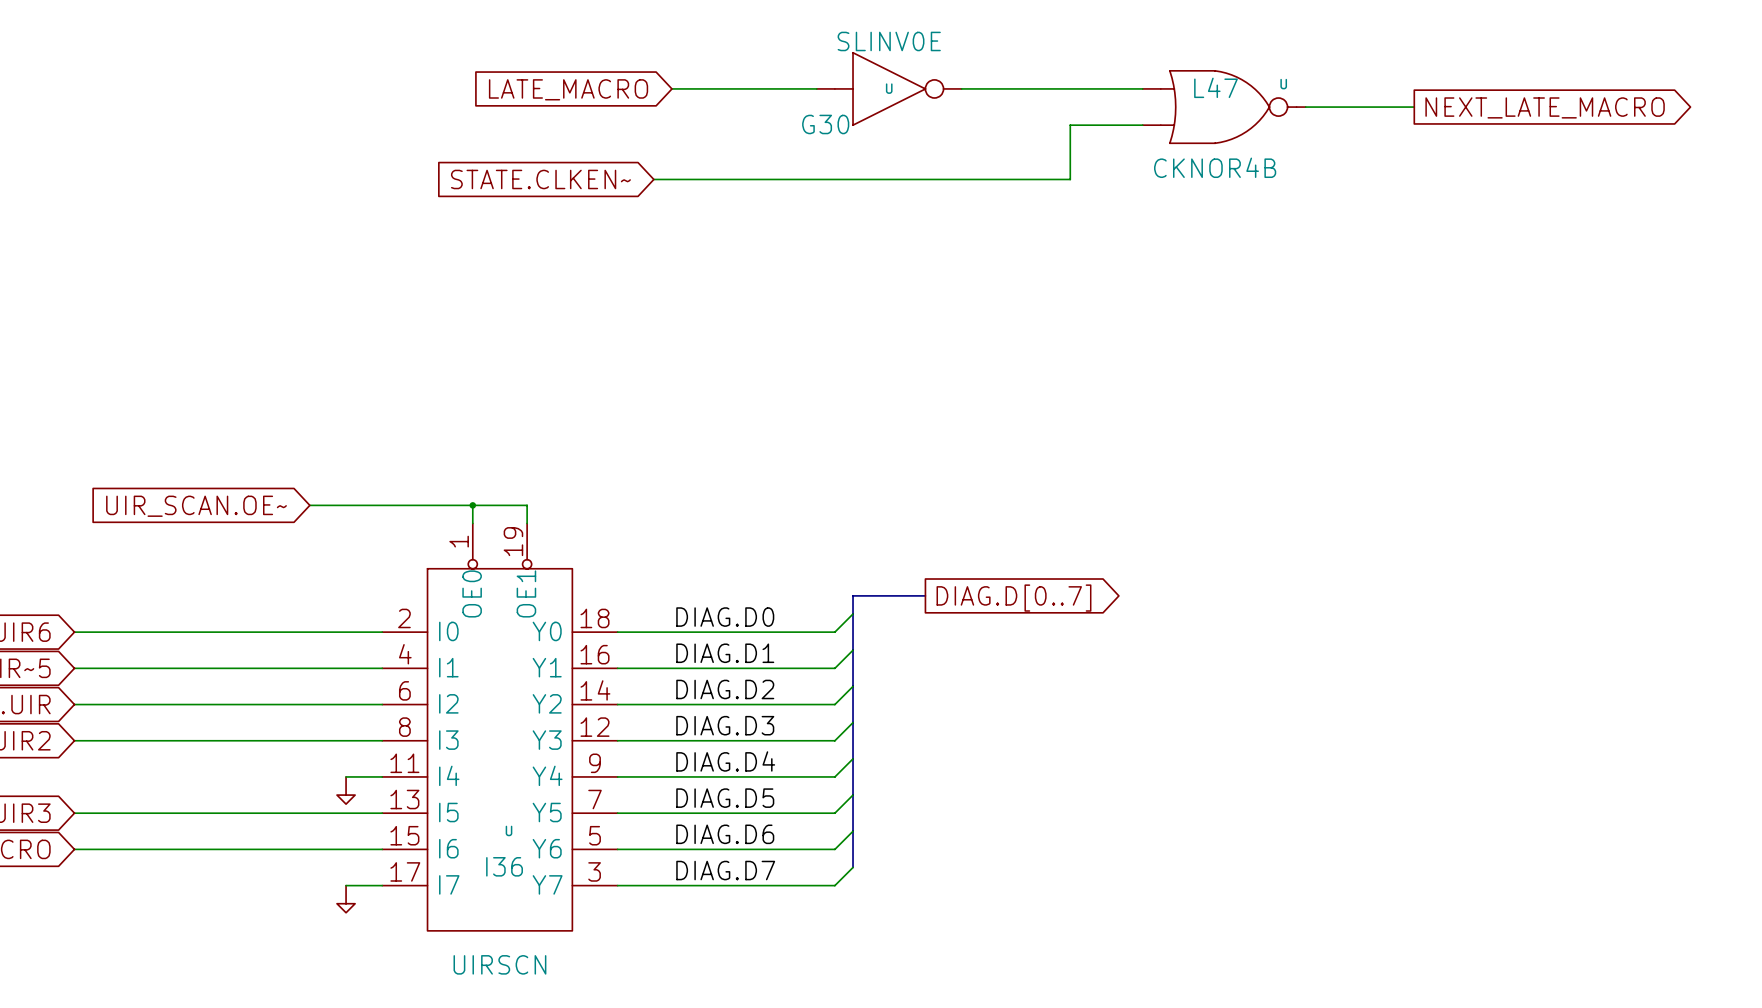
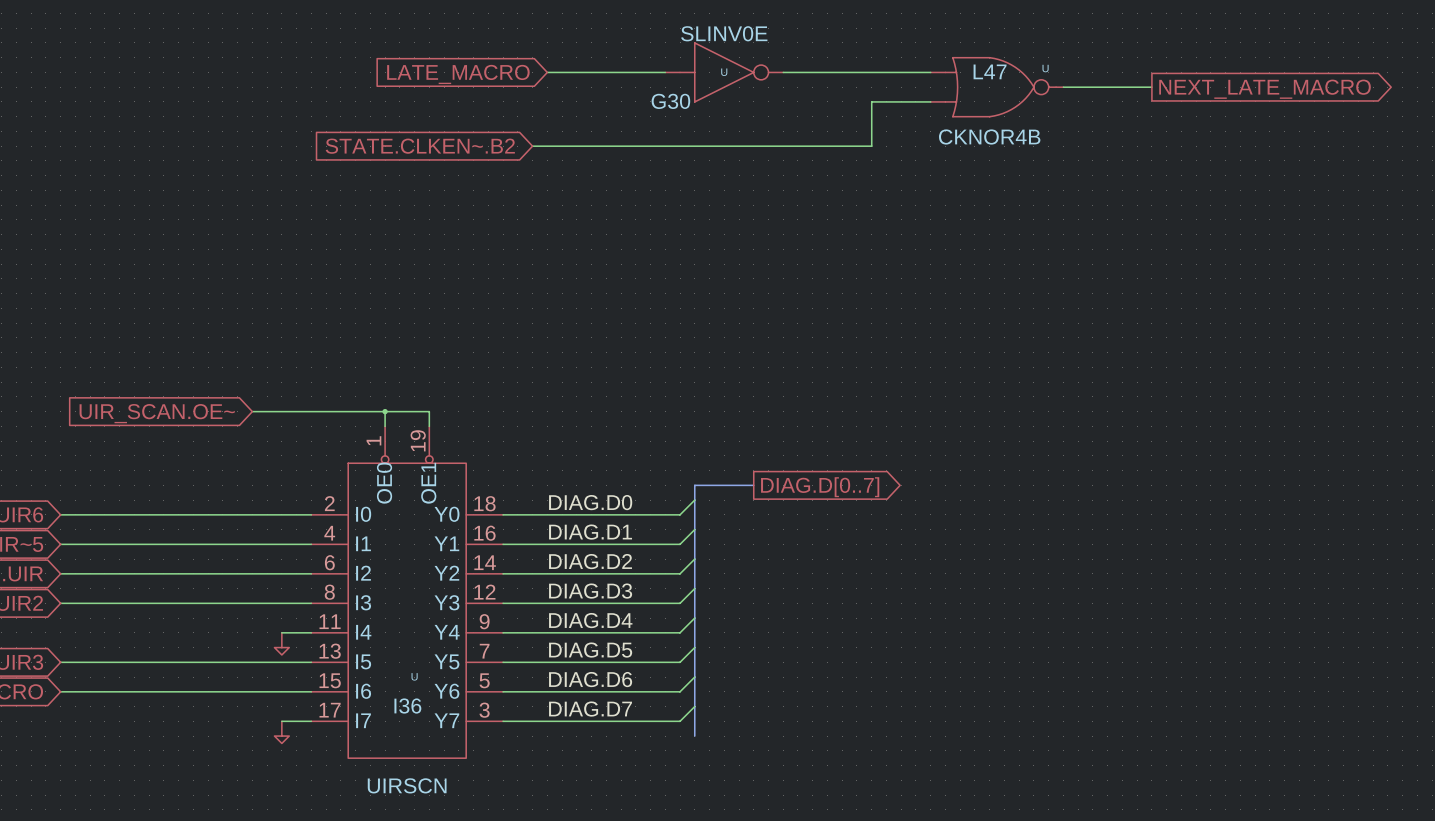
global label: STATE.CLKEN~ (540, 179) -> STATE.CLKEN~.B2 (420, 146)
bus: none -> (694, 706) (694, 736)

